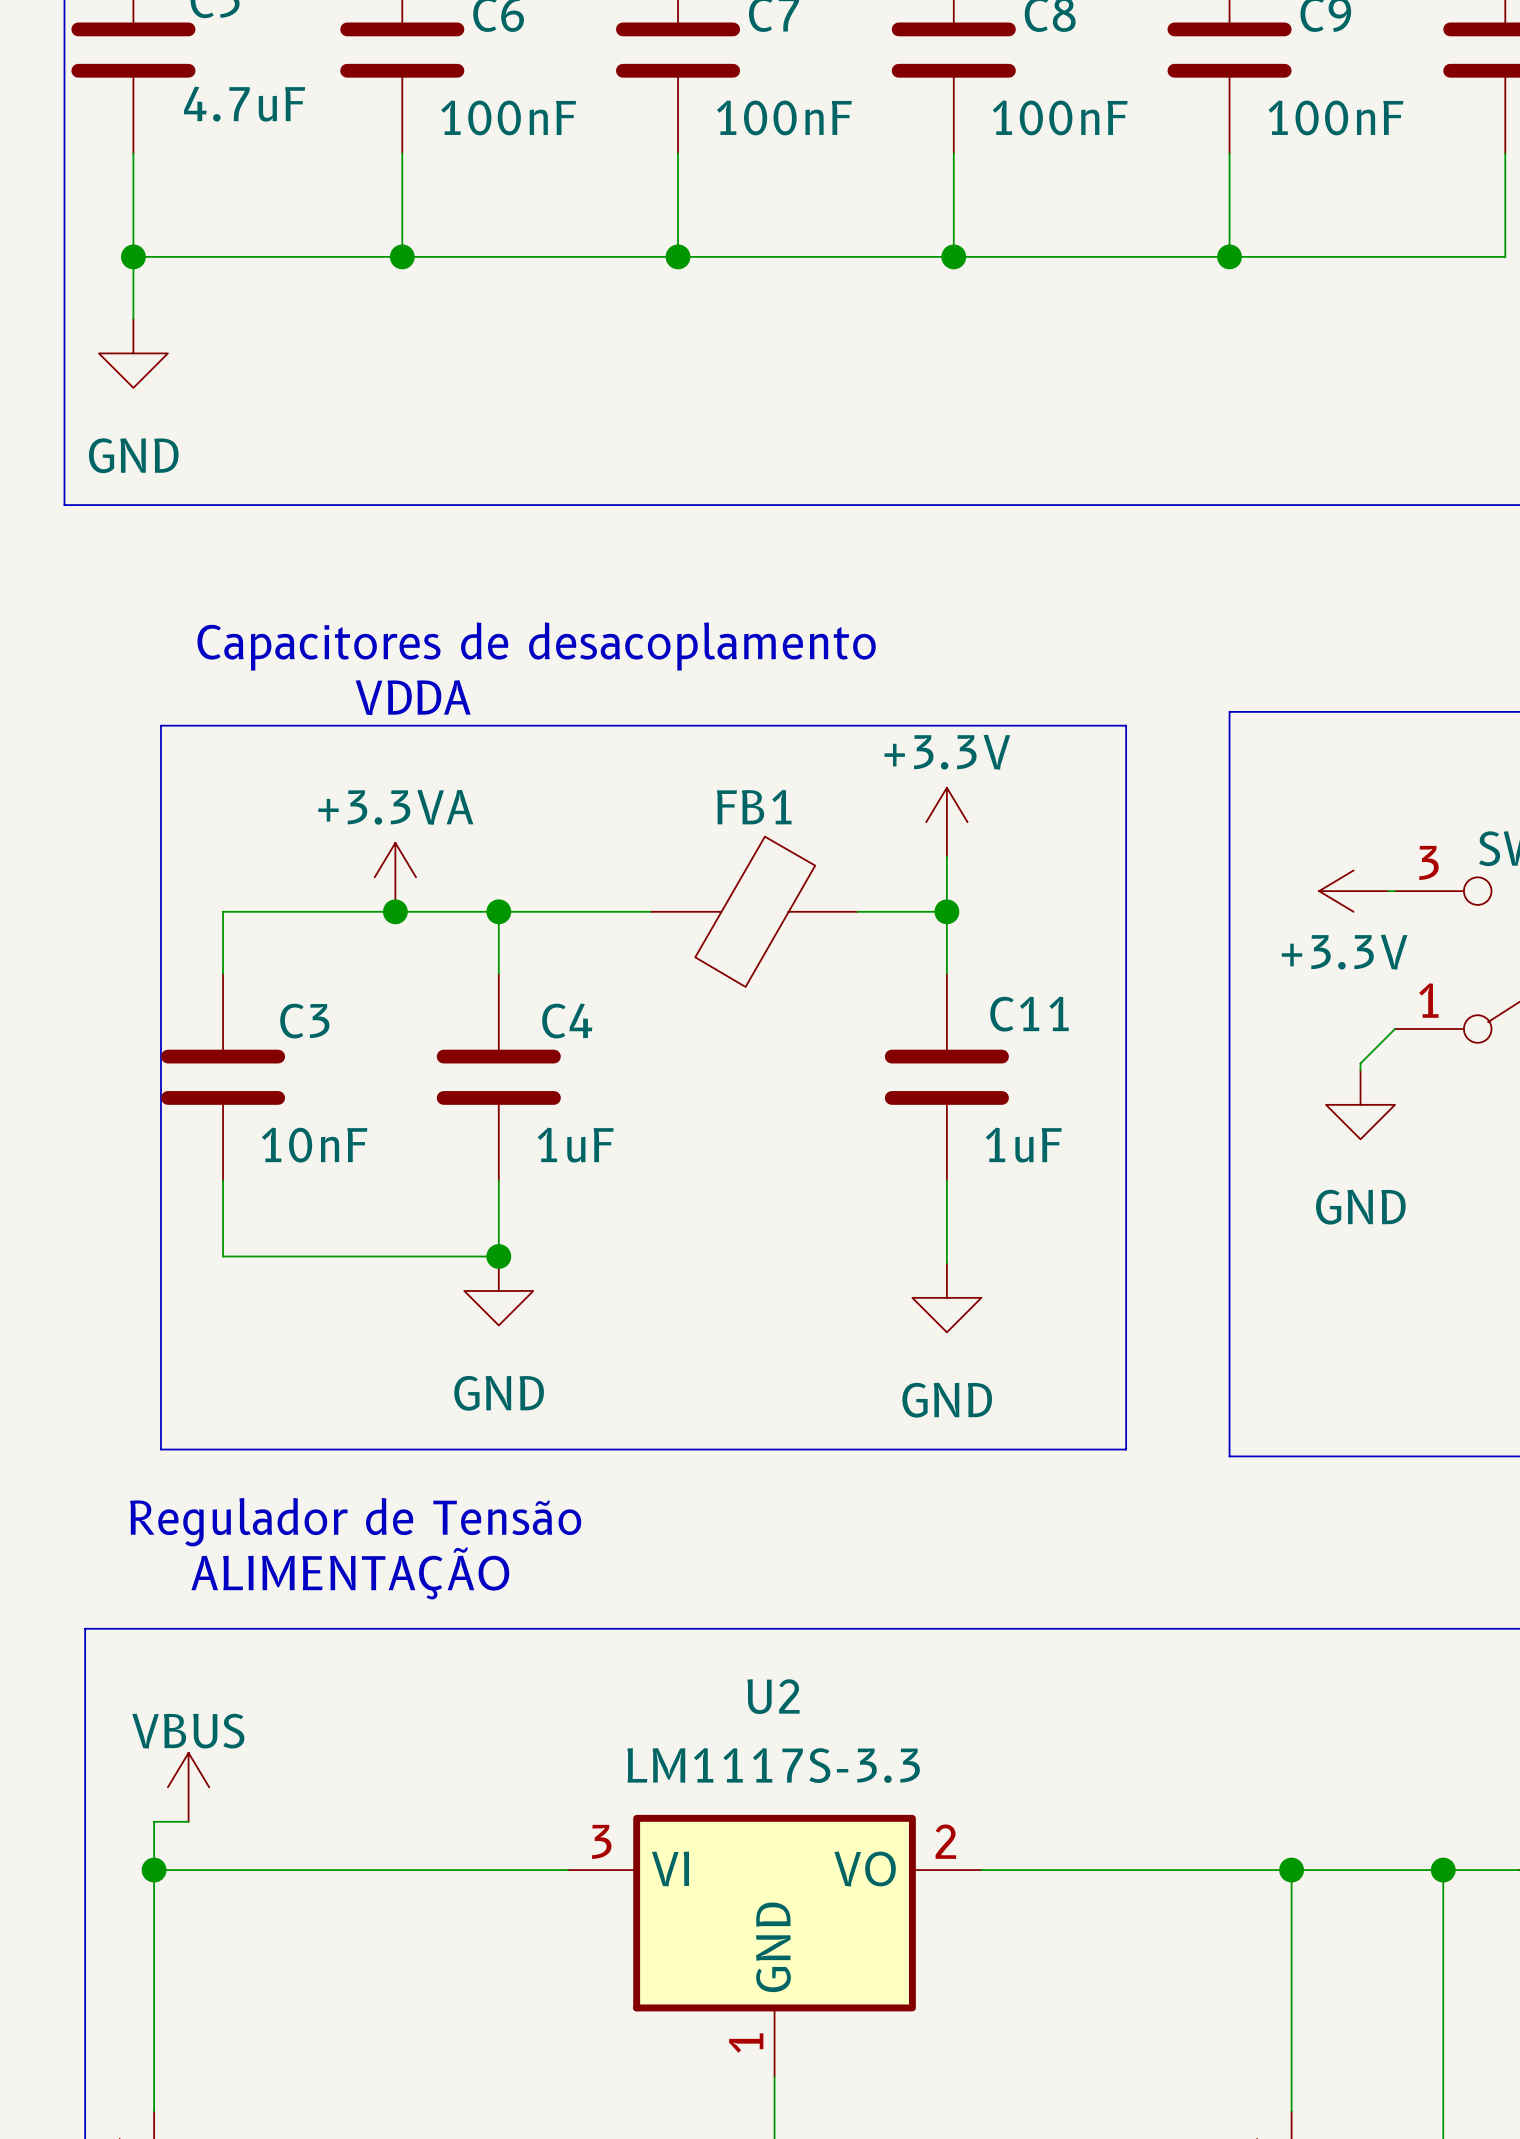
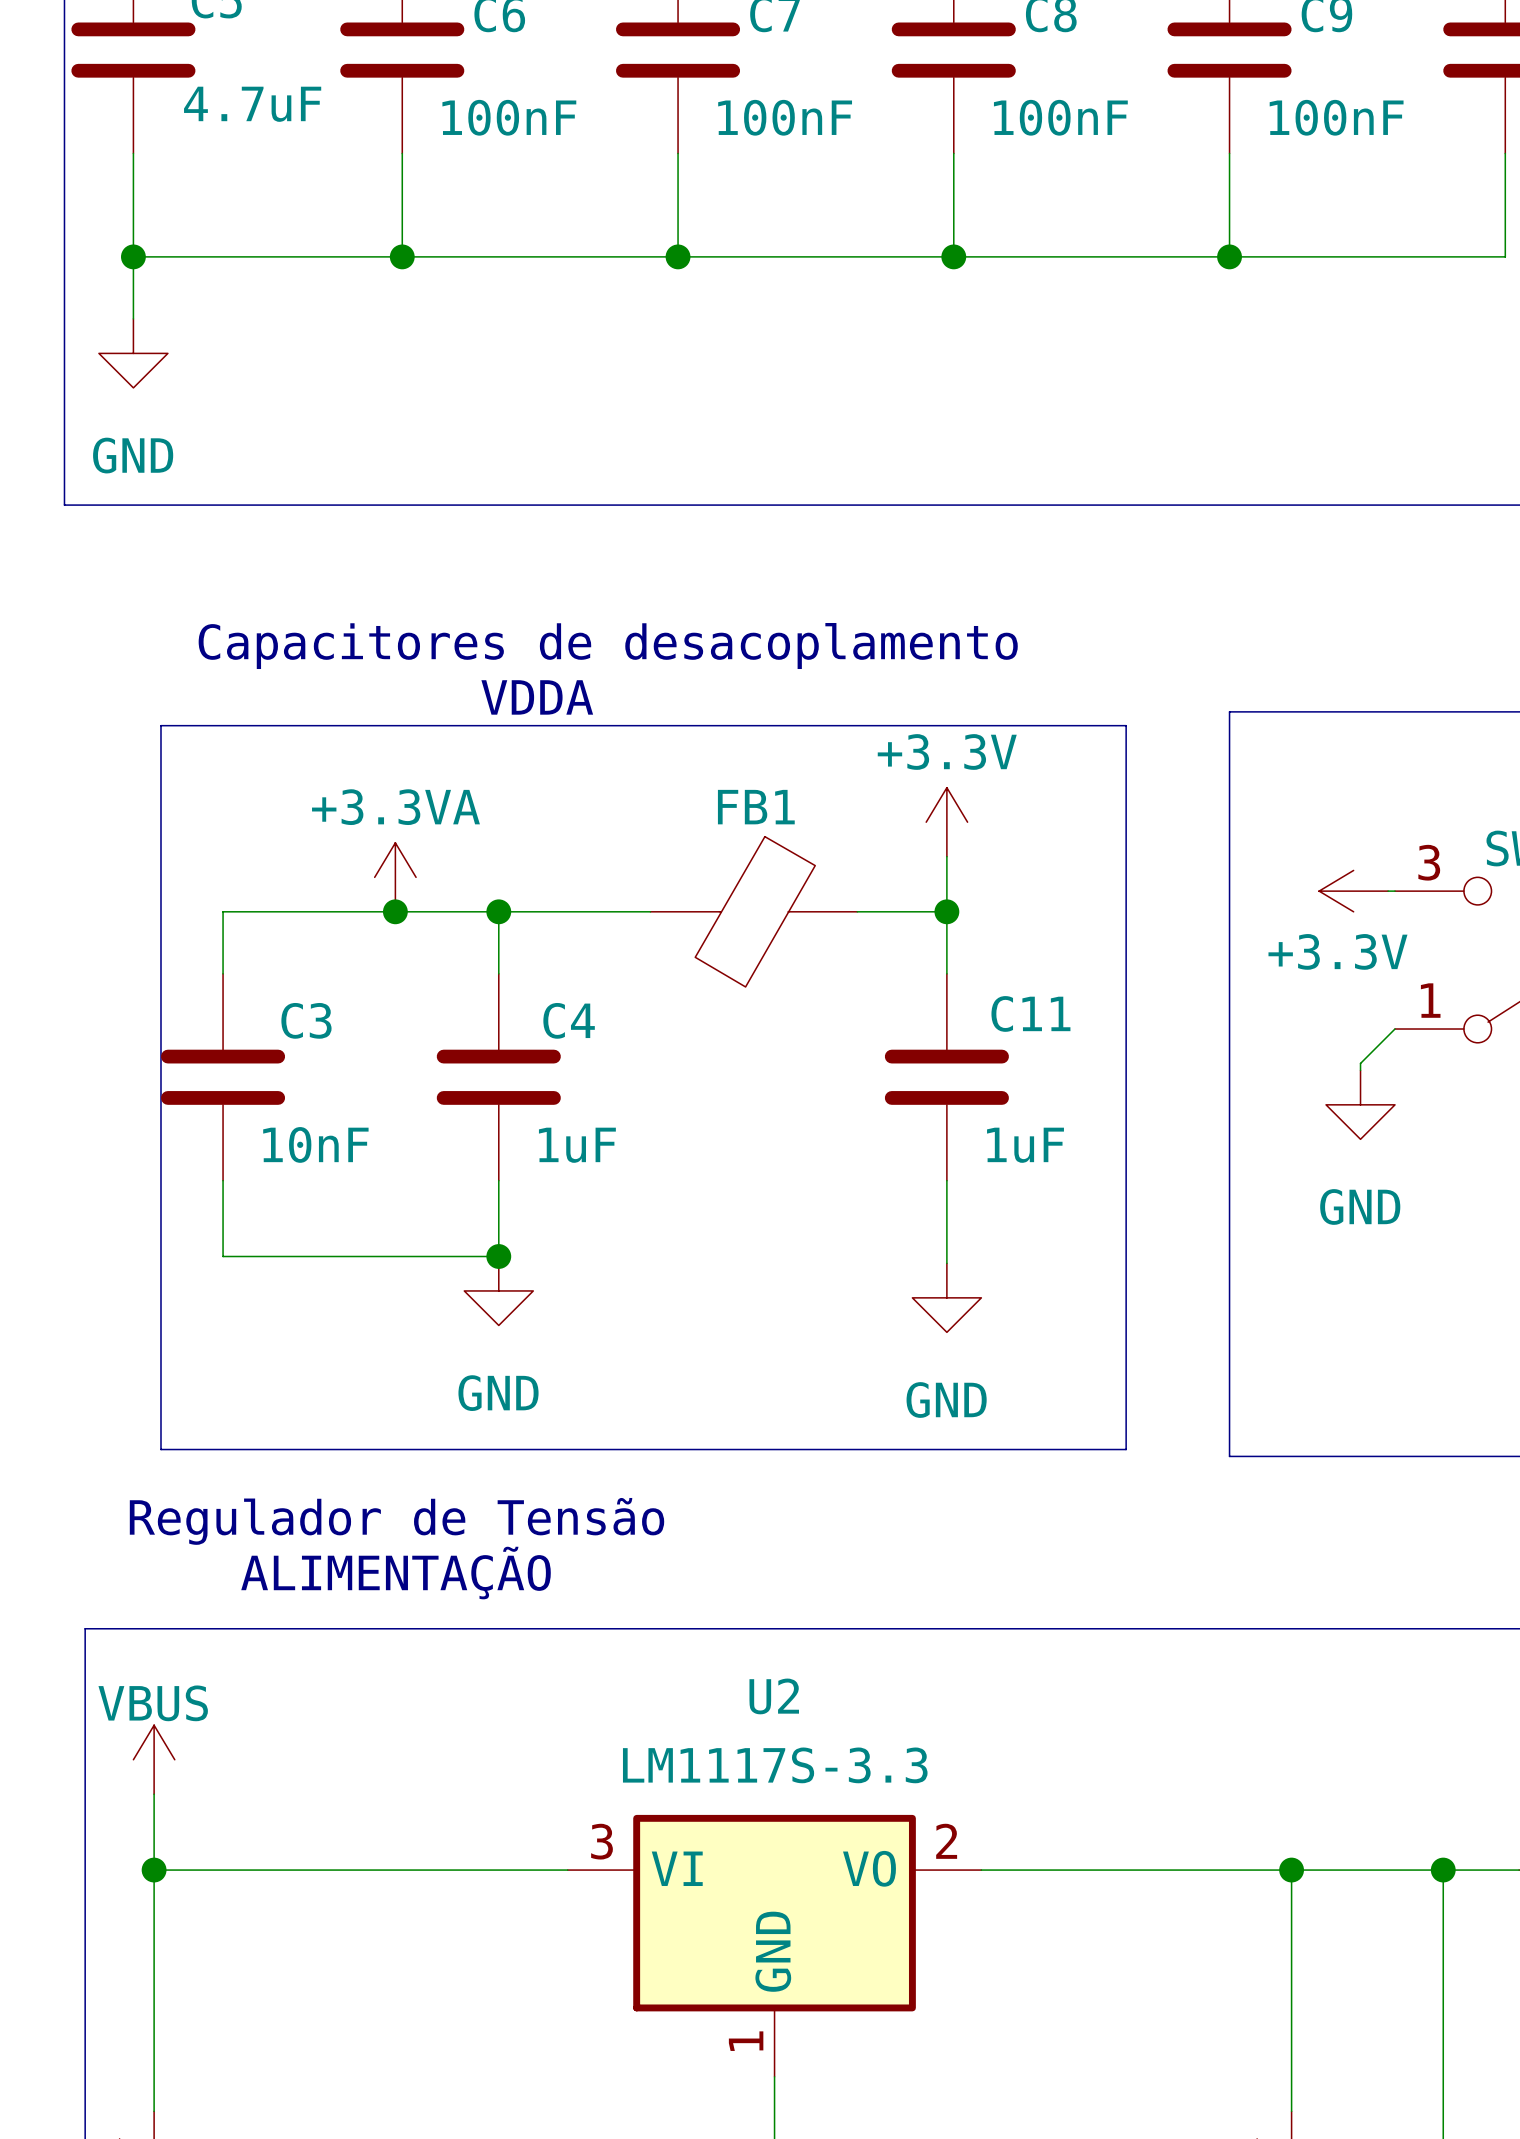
power symbol position: VBUS (188, 1787) -> VBUS (154, 1759)
wire: (154, 1821) (188, 1821) -> (154, 1821) (154, 1794)

